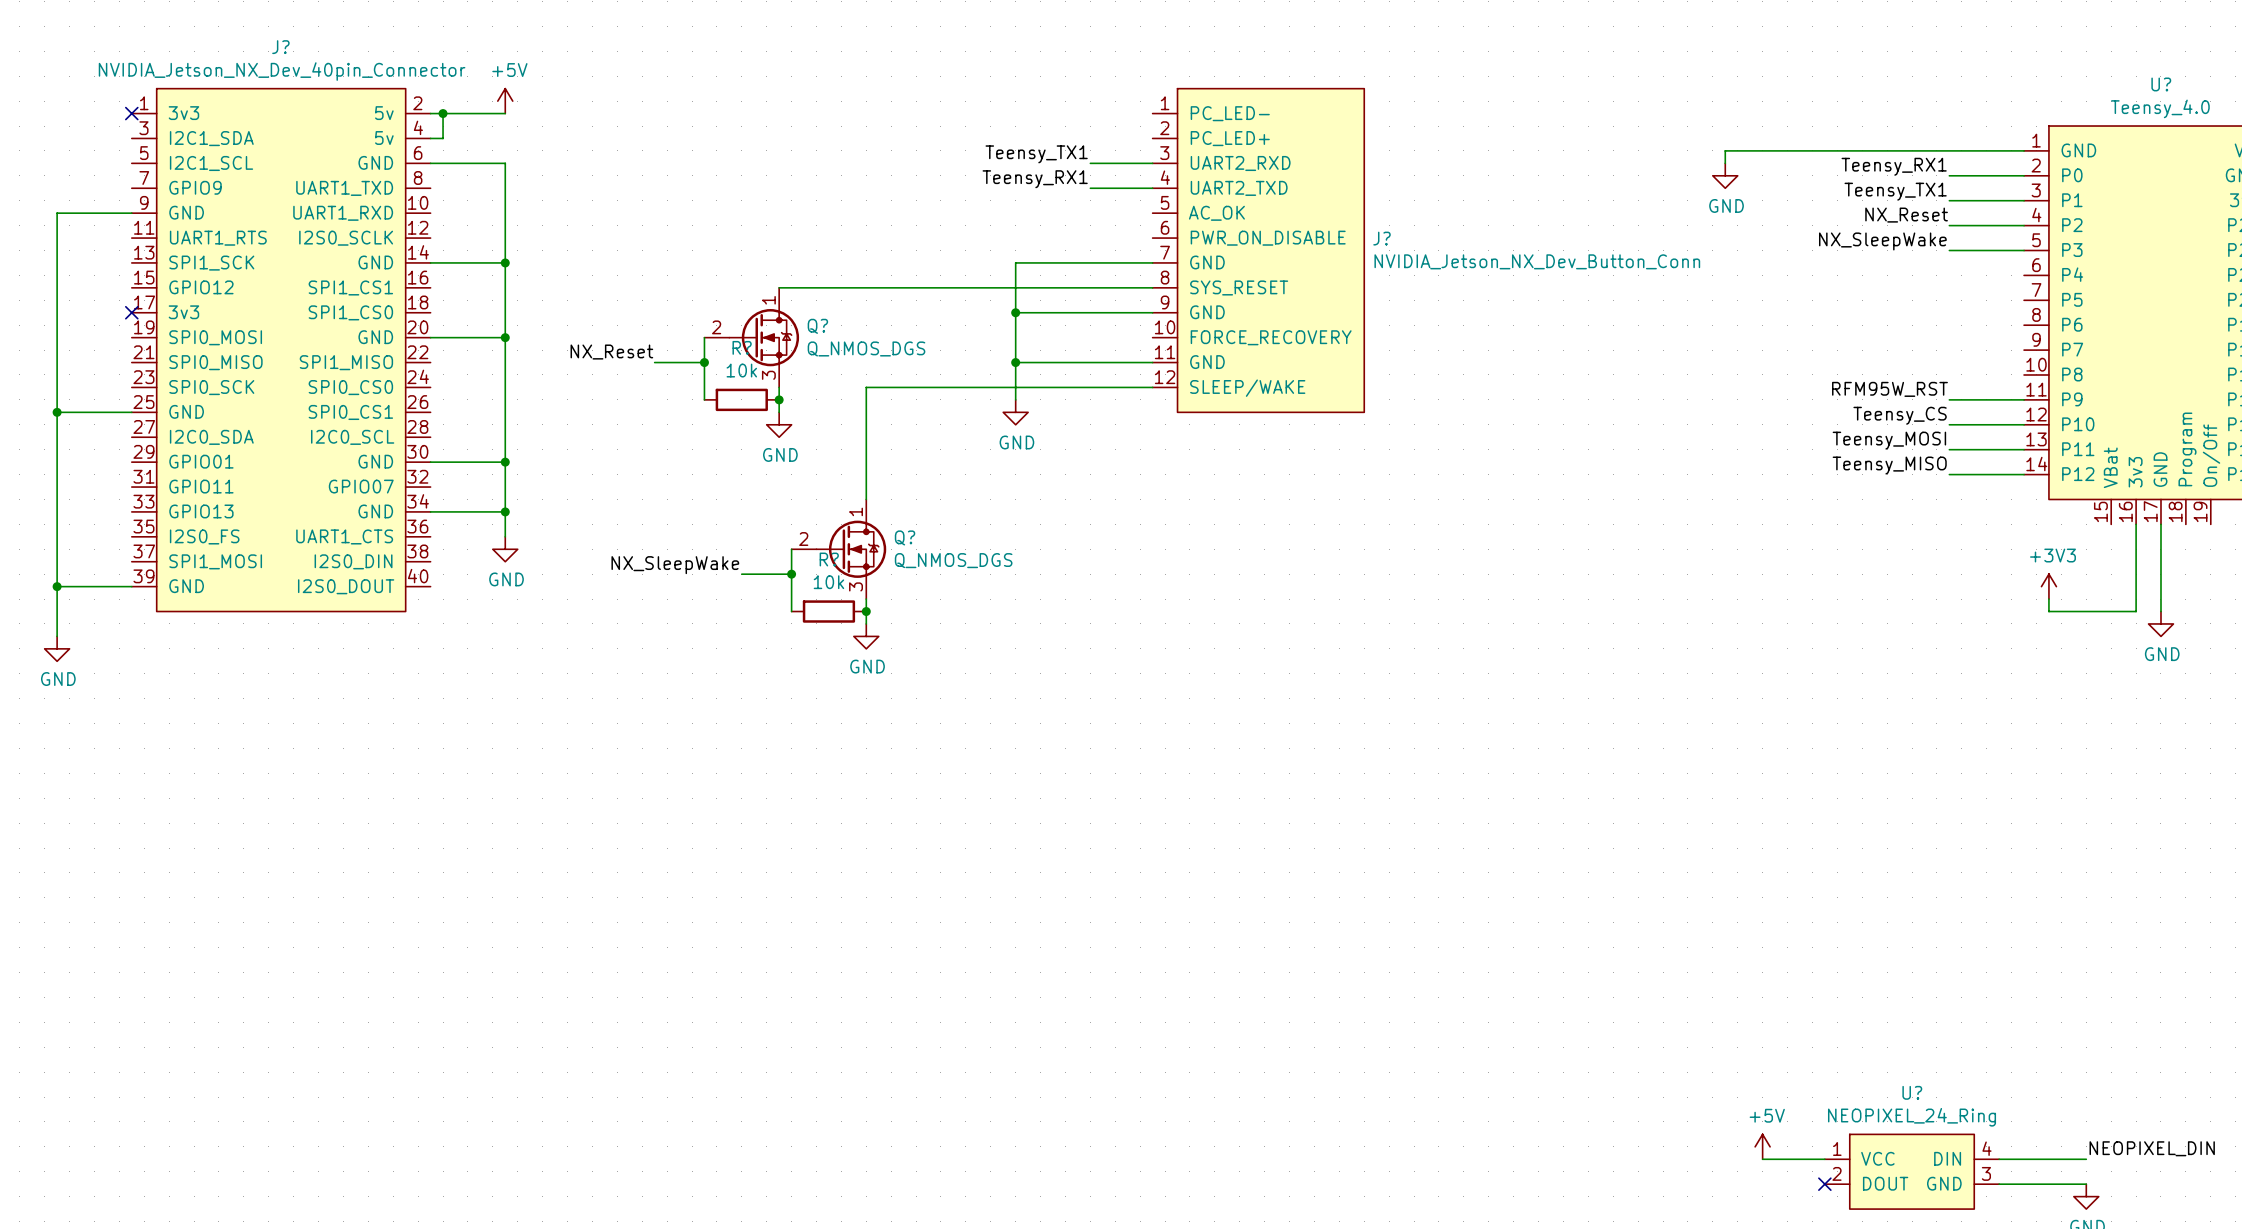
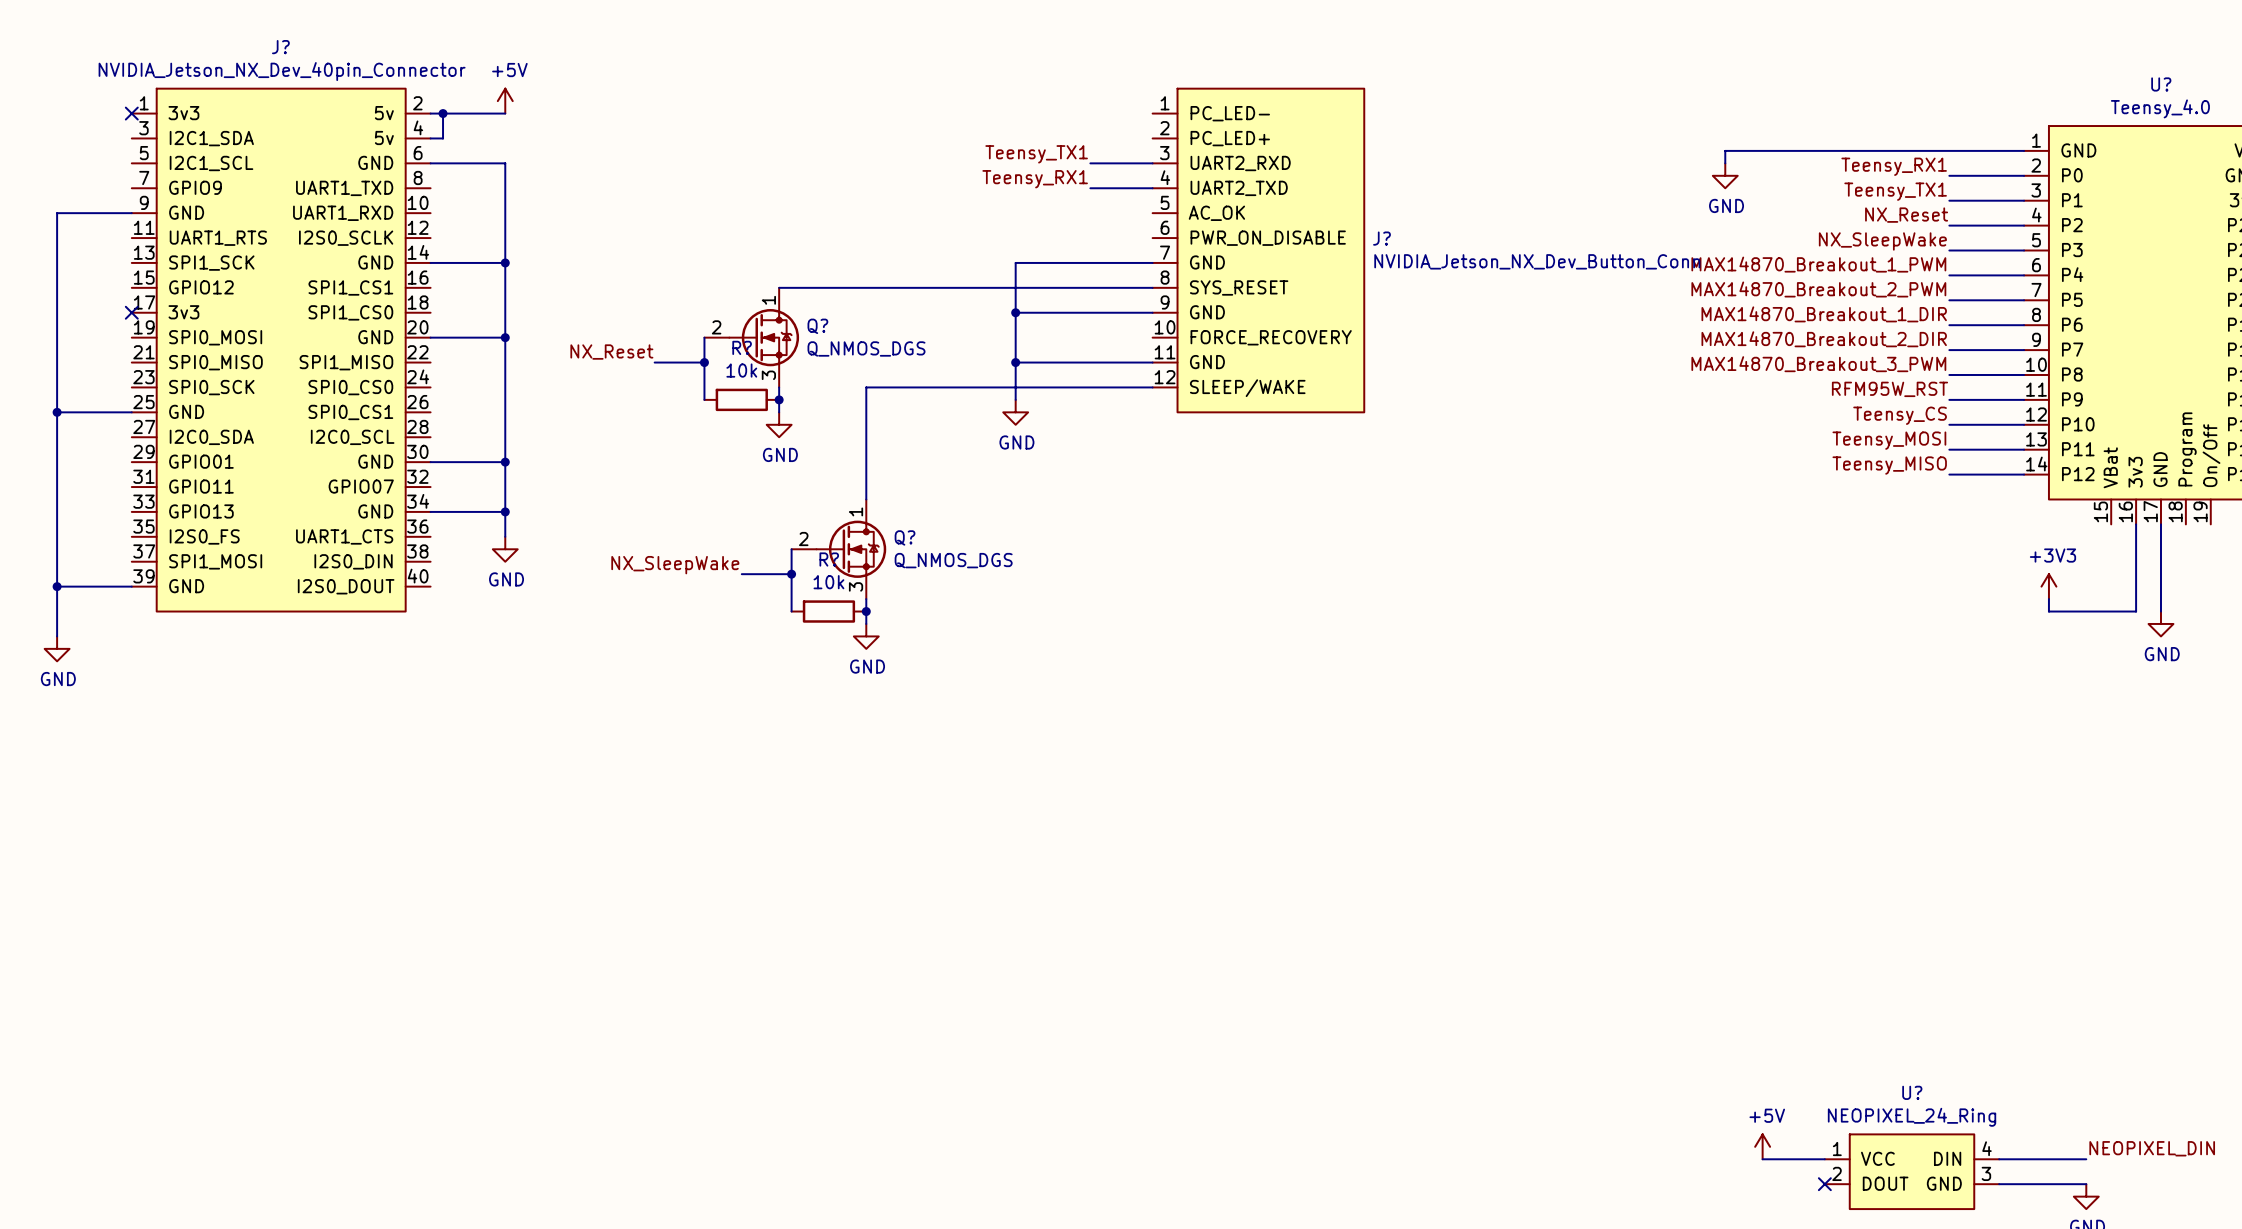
label: none -> MAX14870_Breakout_1_PWM (1818, 264)
wire: none -> (1949, 275) (2024, 275)
label: none -> MAX14870_Breakout_2_PWM (1818, 289)
wire: none -> (1949, 300) (2024, 300)
label: none -> MAX14870_Breakout_1_DIR (1824, 314)
wire: none -> (1949, 325) (2024, 325)
label: none -> MAX14870_Breakout_2_DIR (1824, 339)
wire: none -> (1949, 350) (2024, 350)
label: none -> MAX14870_Breakout_3_PWM (1818, 364)
wire: none -> (1949, 374) (2024, 374)

